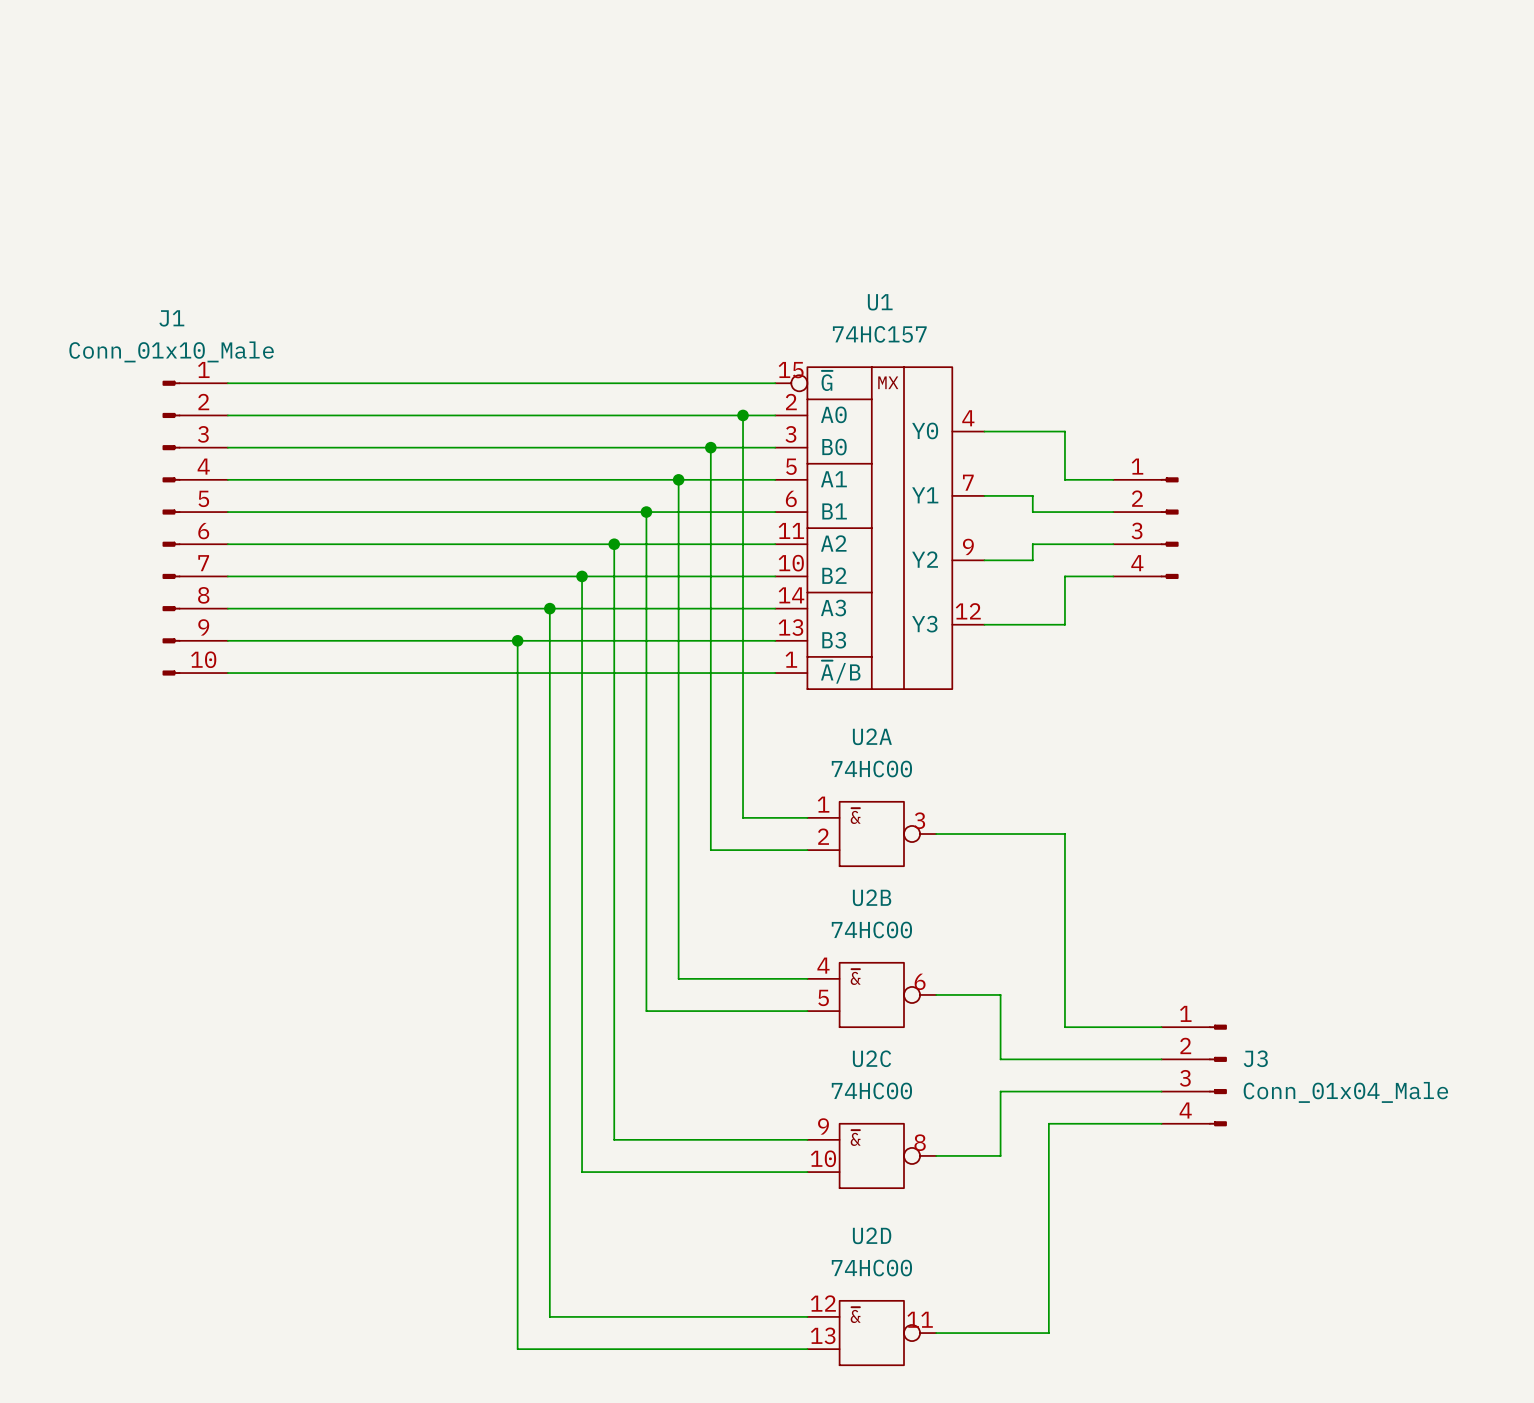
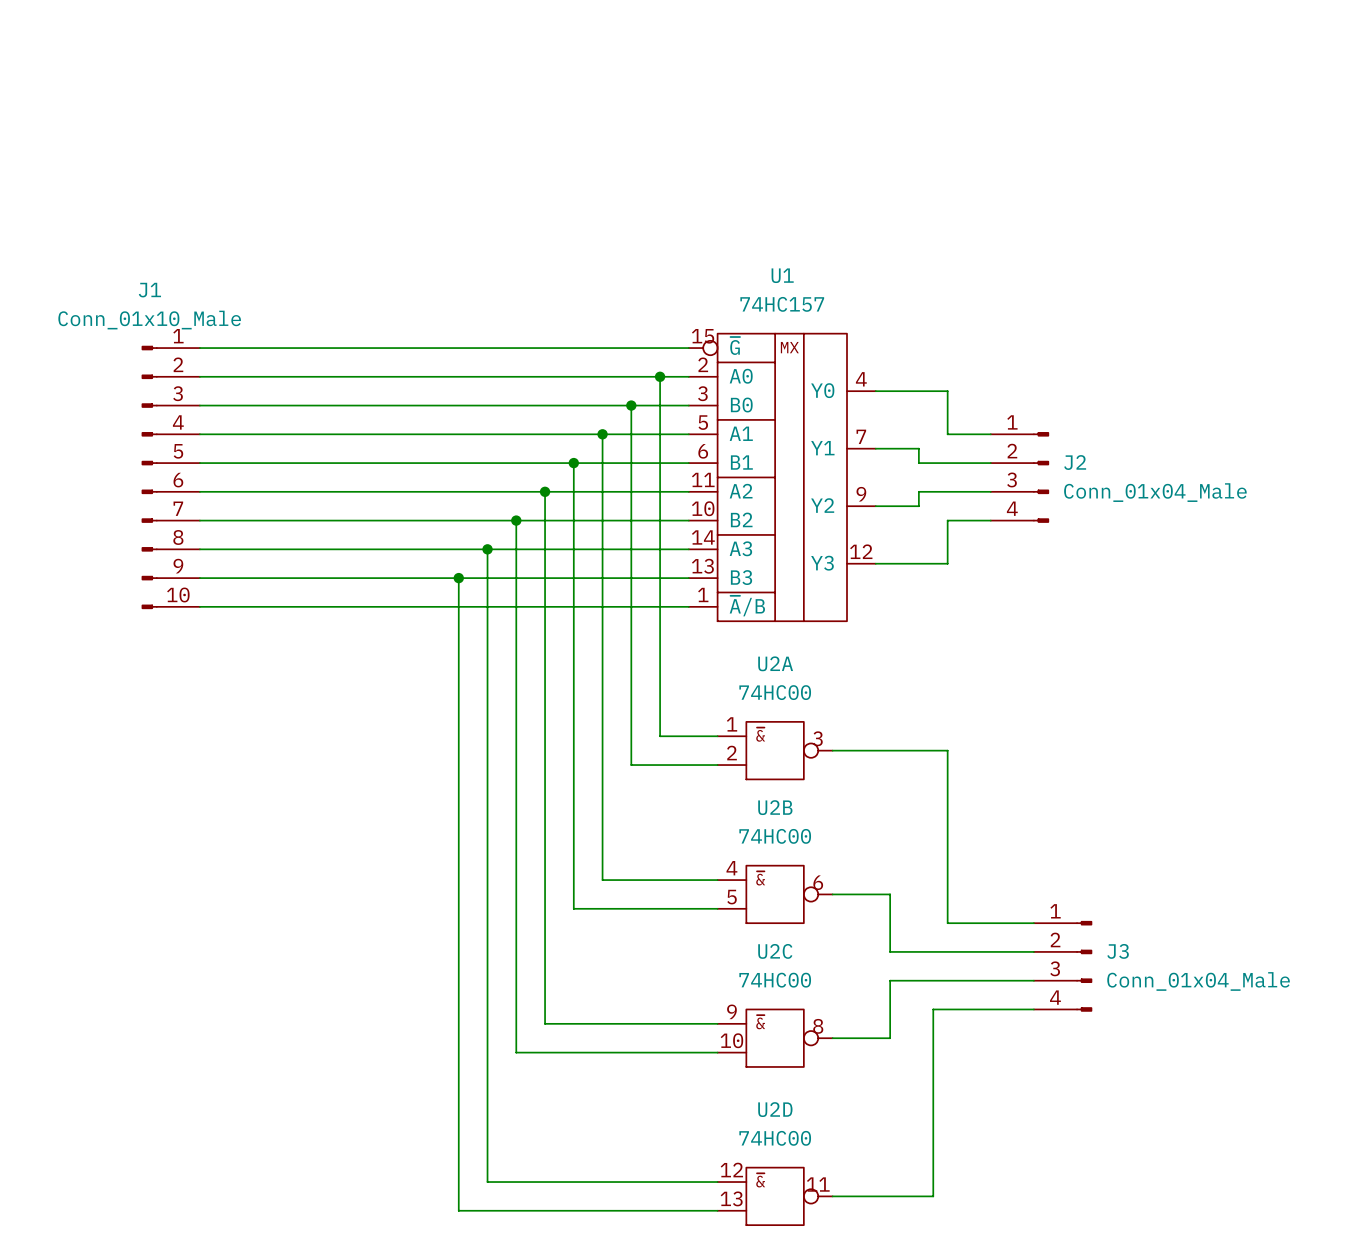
J2 name: none -> J2 (1075, 462)
J2 value: none -> Conn_01x04_Male (1155, 492)

